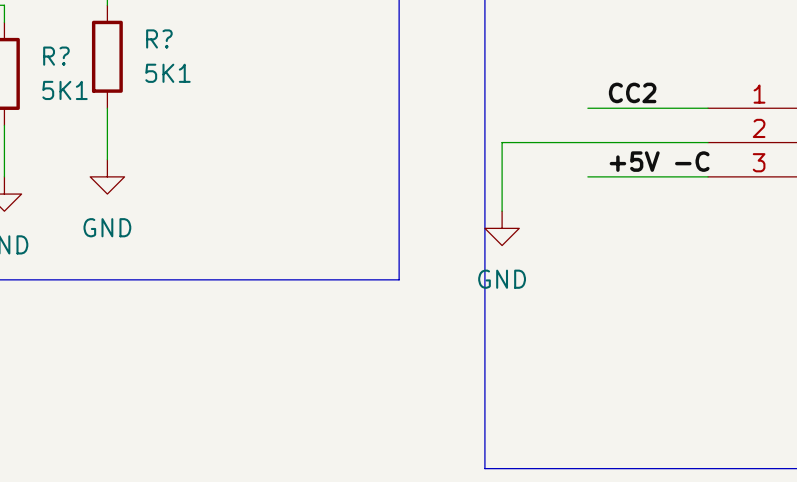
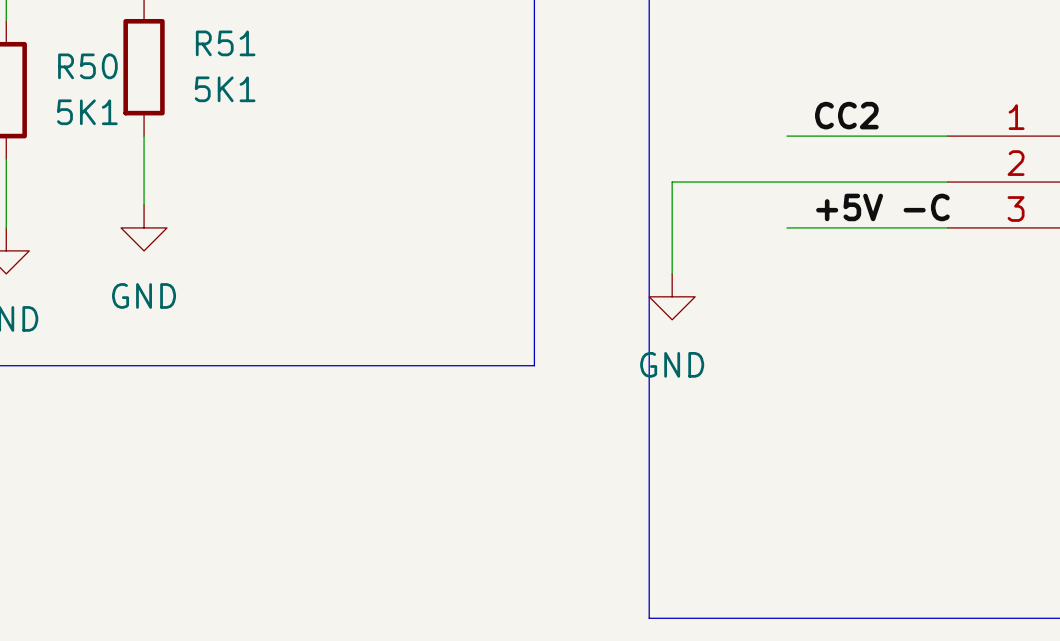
R? name: R? (159, 38) -> R51 (225, 43)
R? name: R? (56, 56) -> R50 (87, 66)

